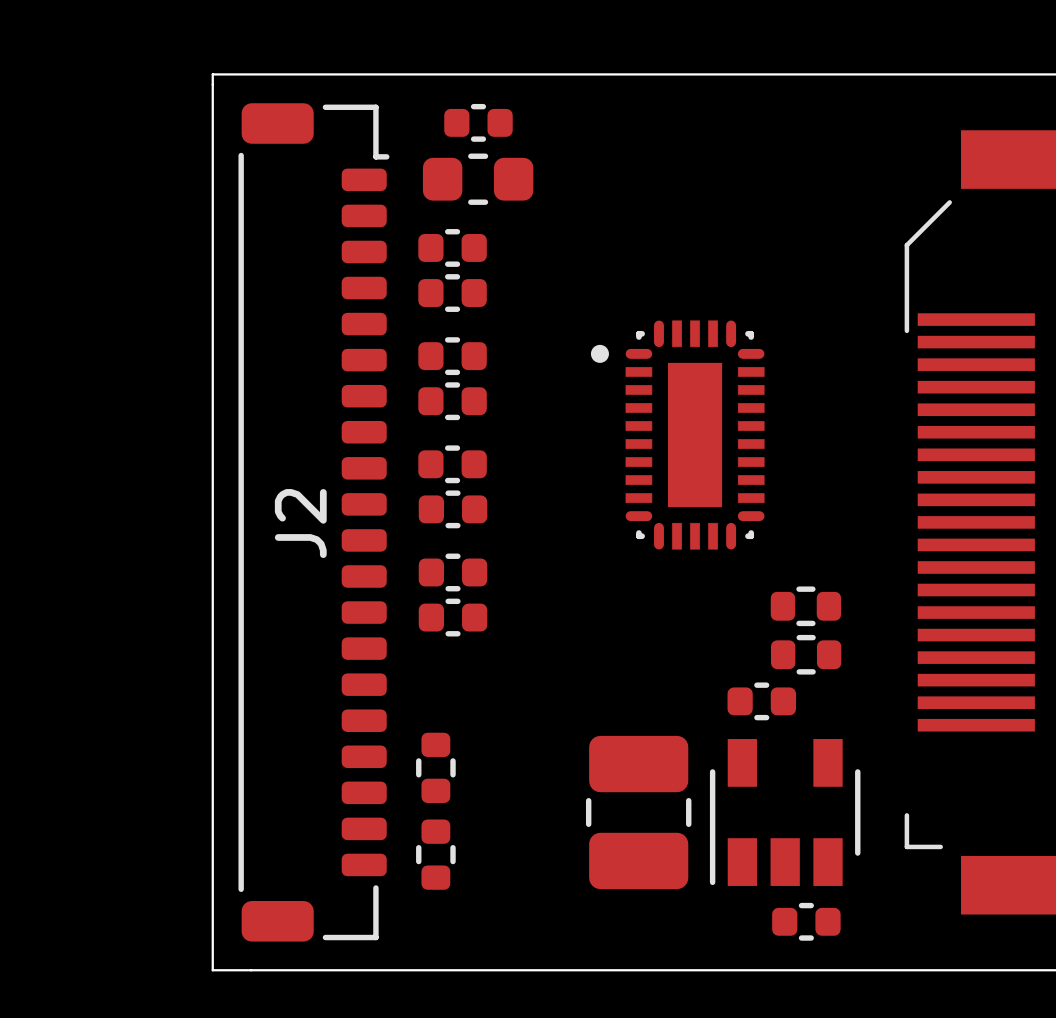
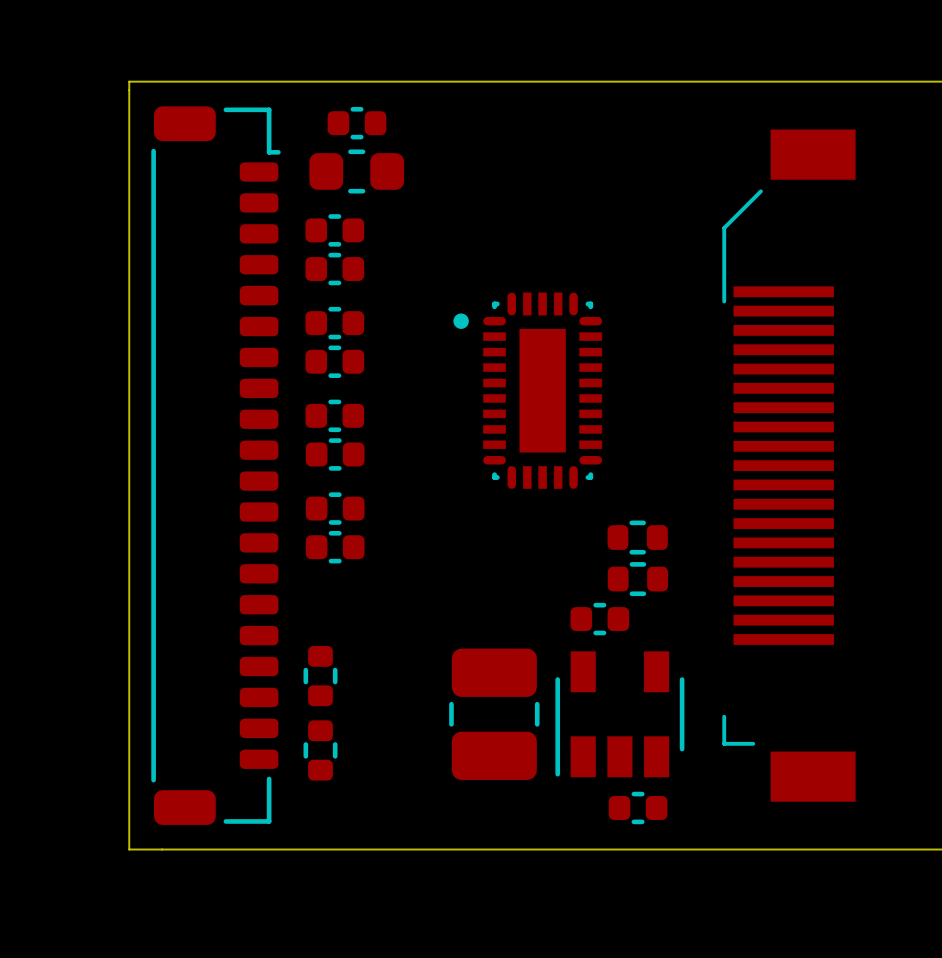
J2 name: J2 (300, 523) -> none

